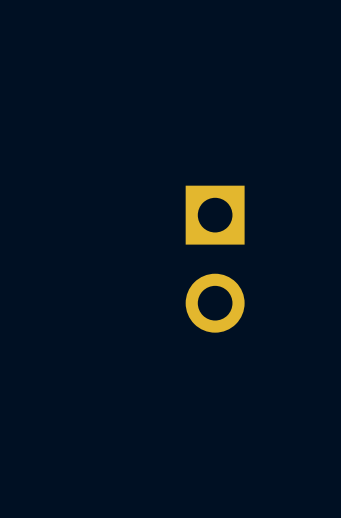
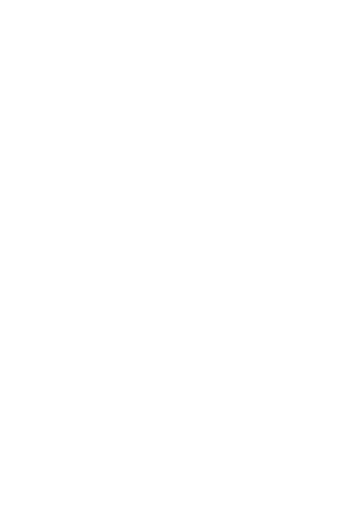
part: (215, 259) -> none

